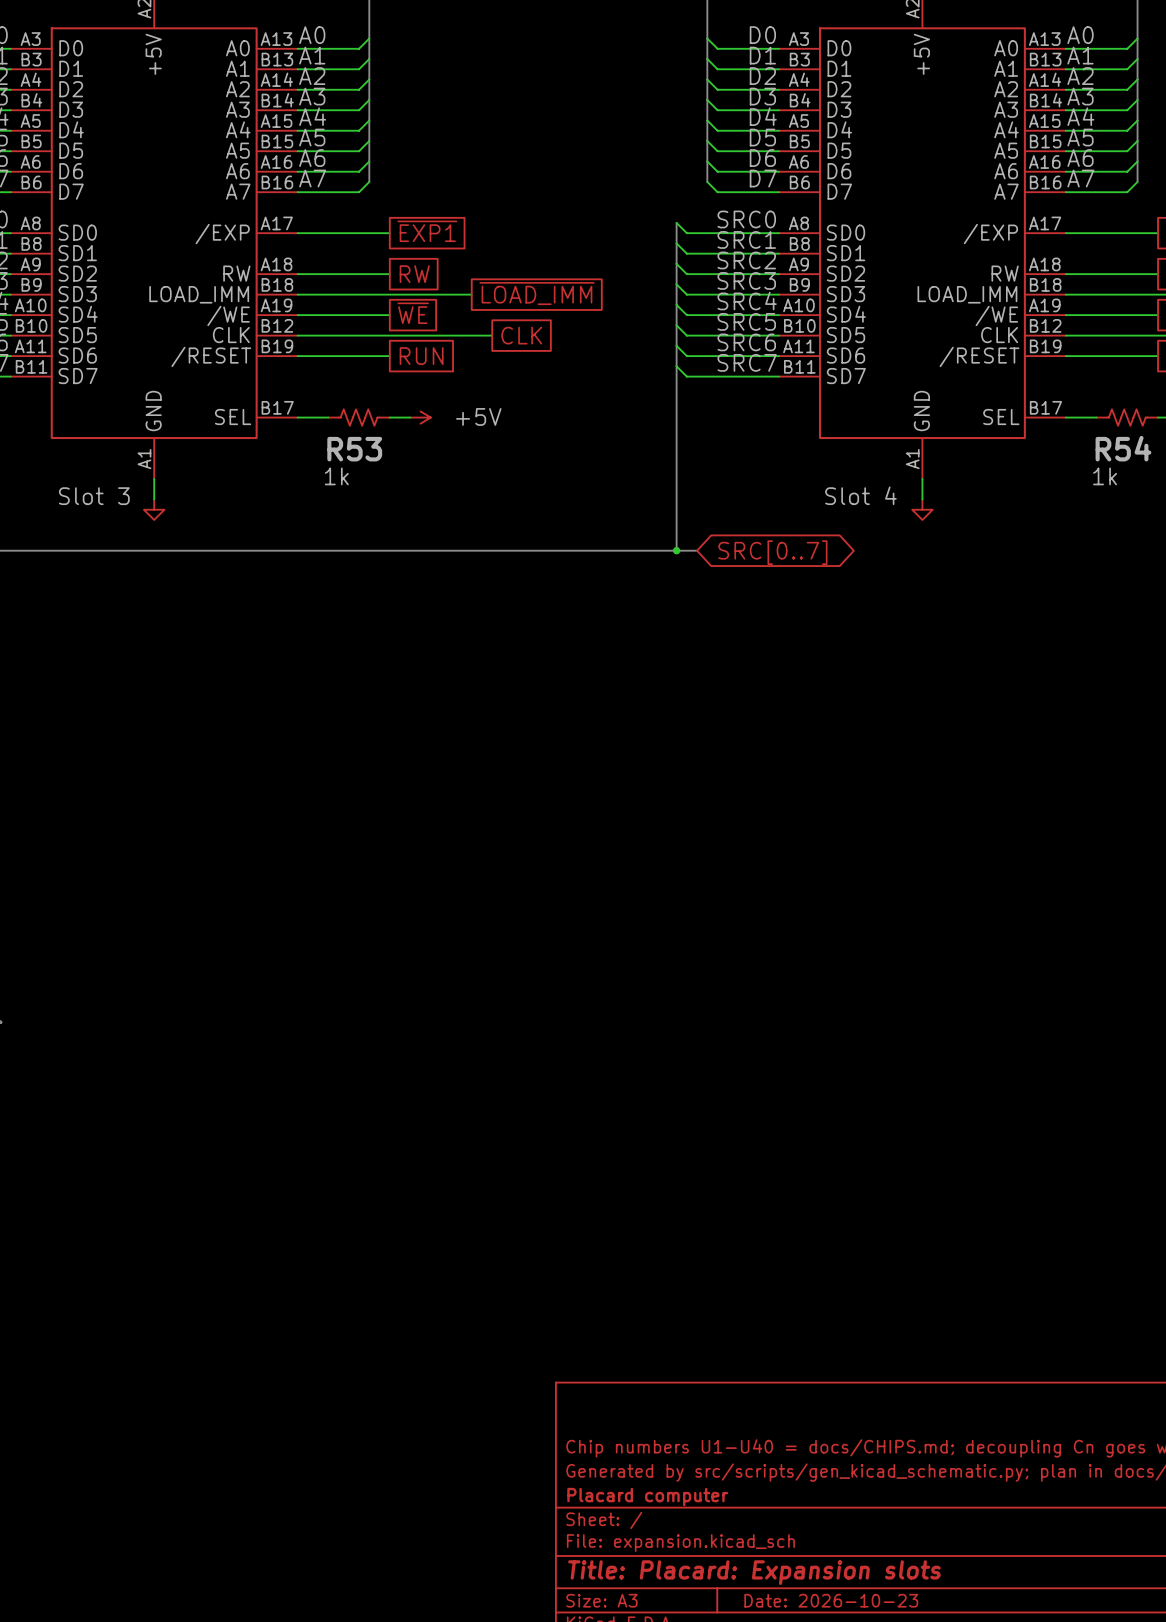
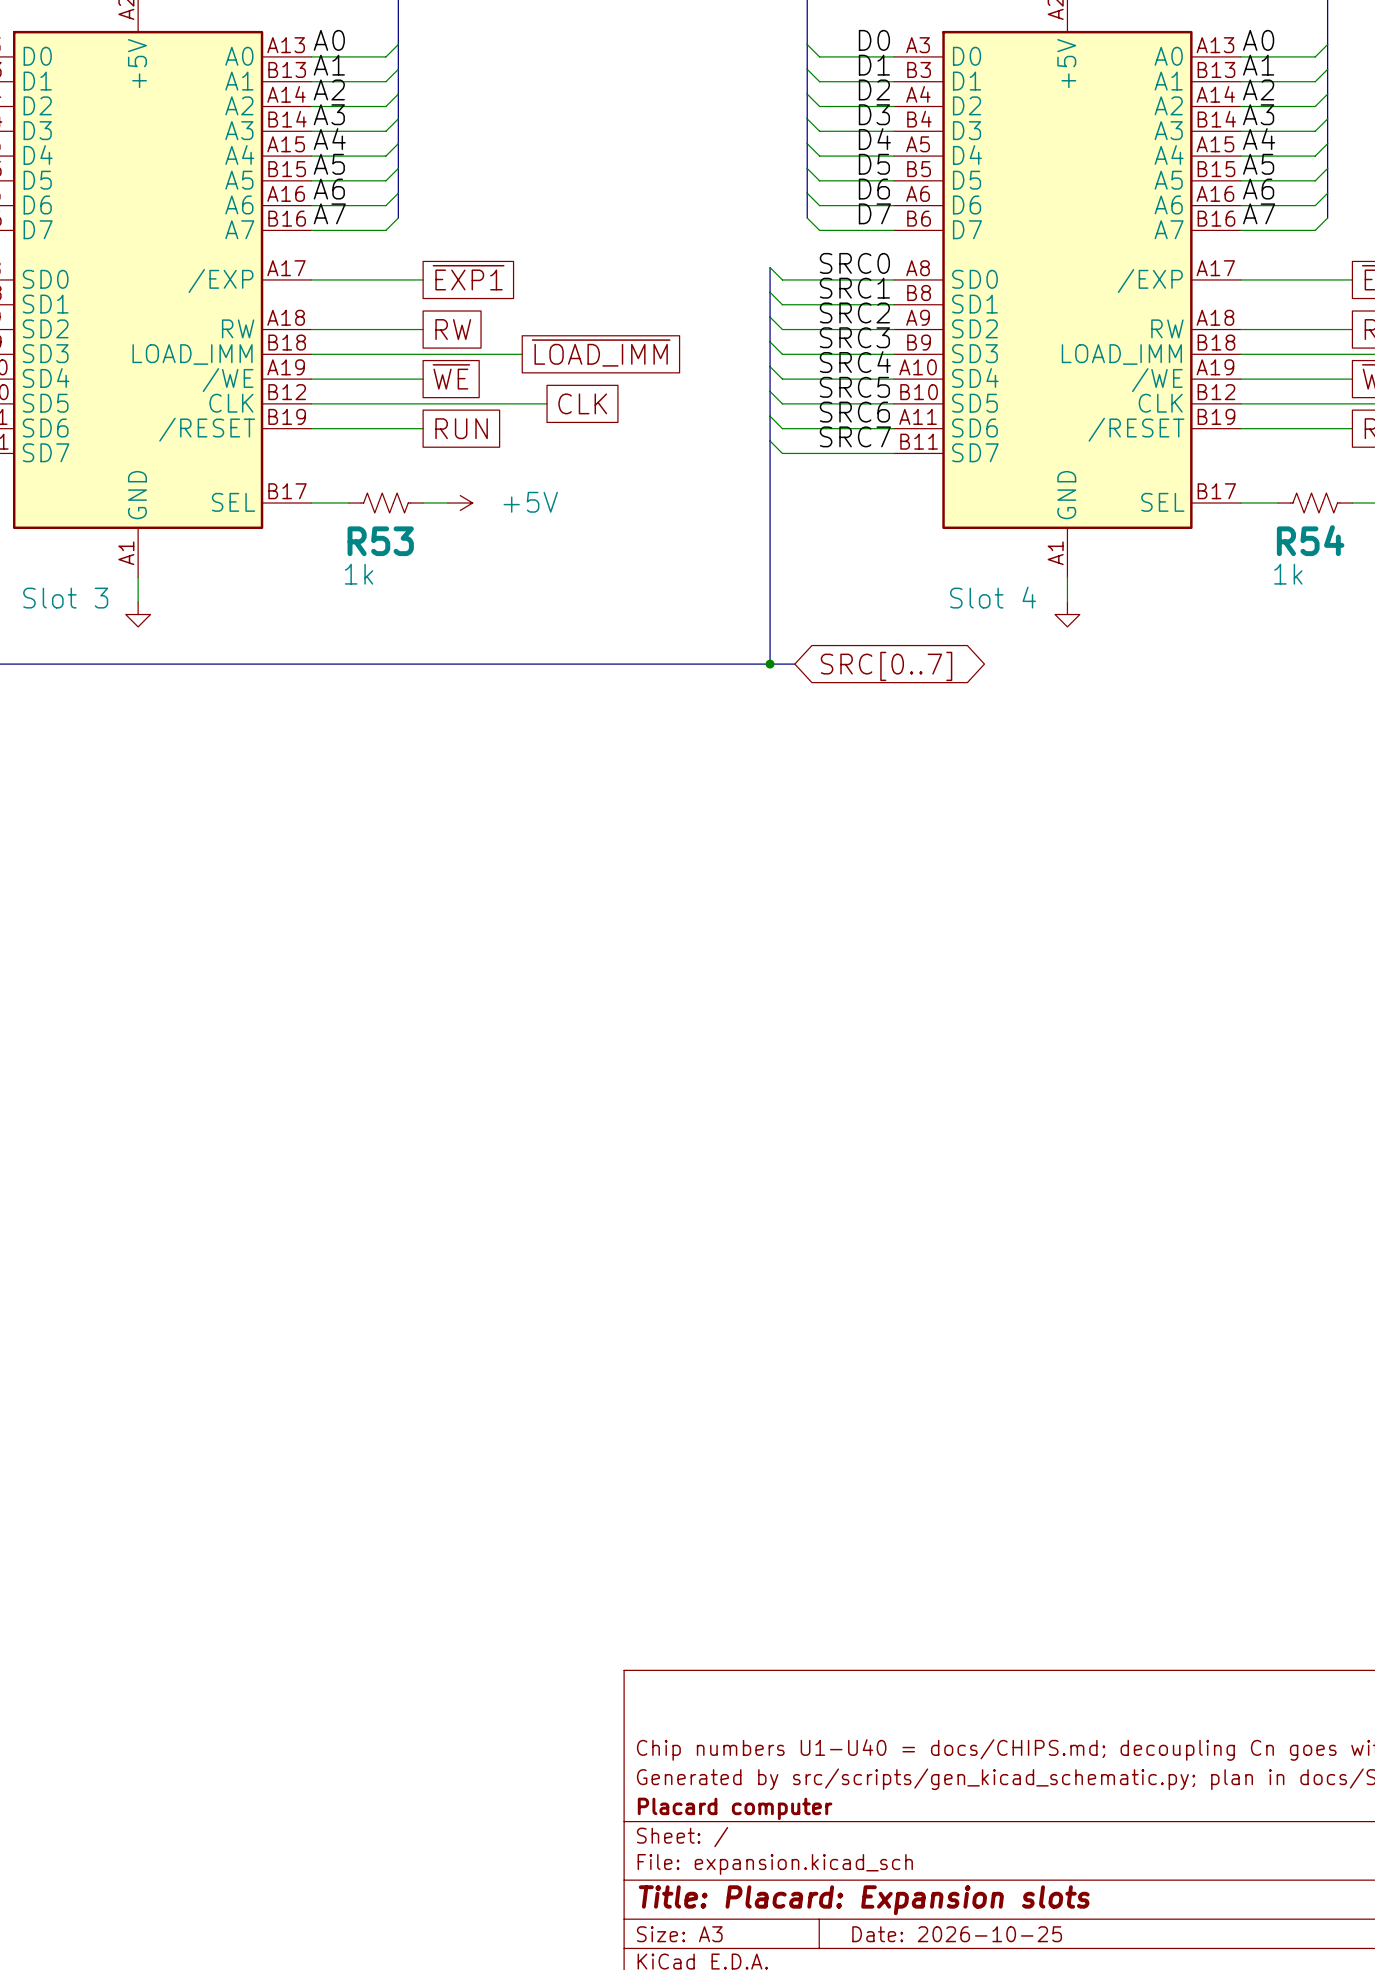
title block: Date: 2026-10-23 (831, 1600) -> Date: 2026-10-25 (957, 1934)

